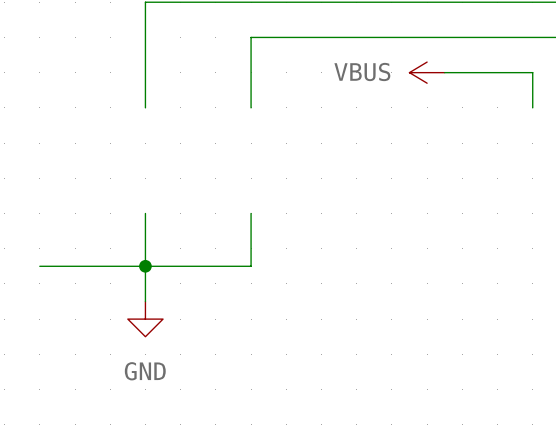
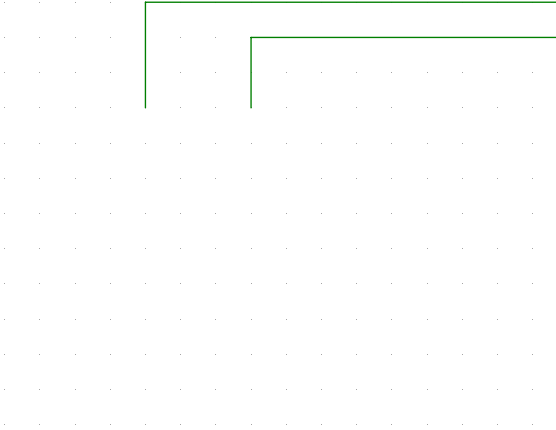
power symbol: VBUS (427, 72) -> none
wire: (444, 72) (532, 72) (532, 107) -> none
wire: (145, 213) (145, 301) -> none
wire: (251, 213) (251, 266) (39, 266) -> none
junction: (145, 266) -> none
power symbol: GND (145, 319) -> none

